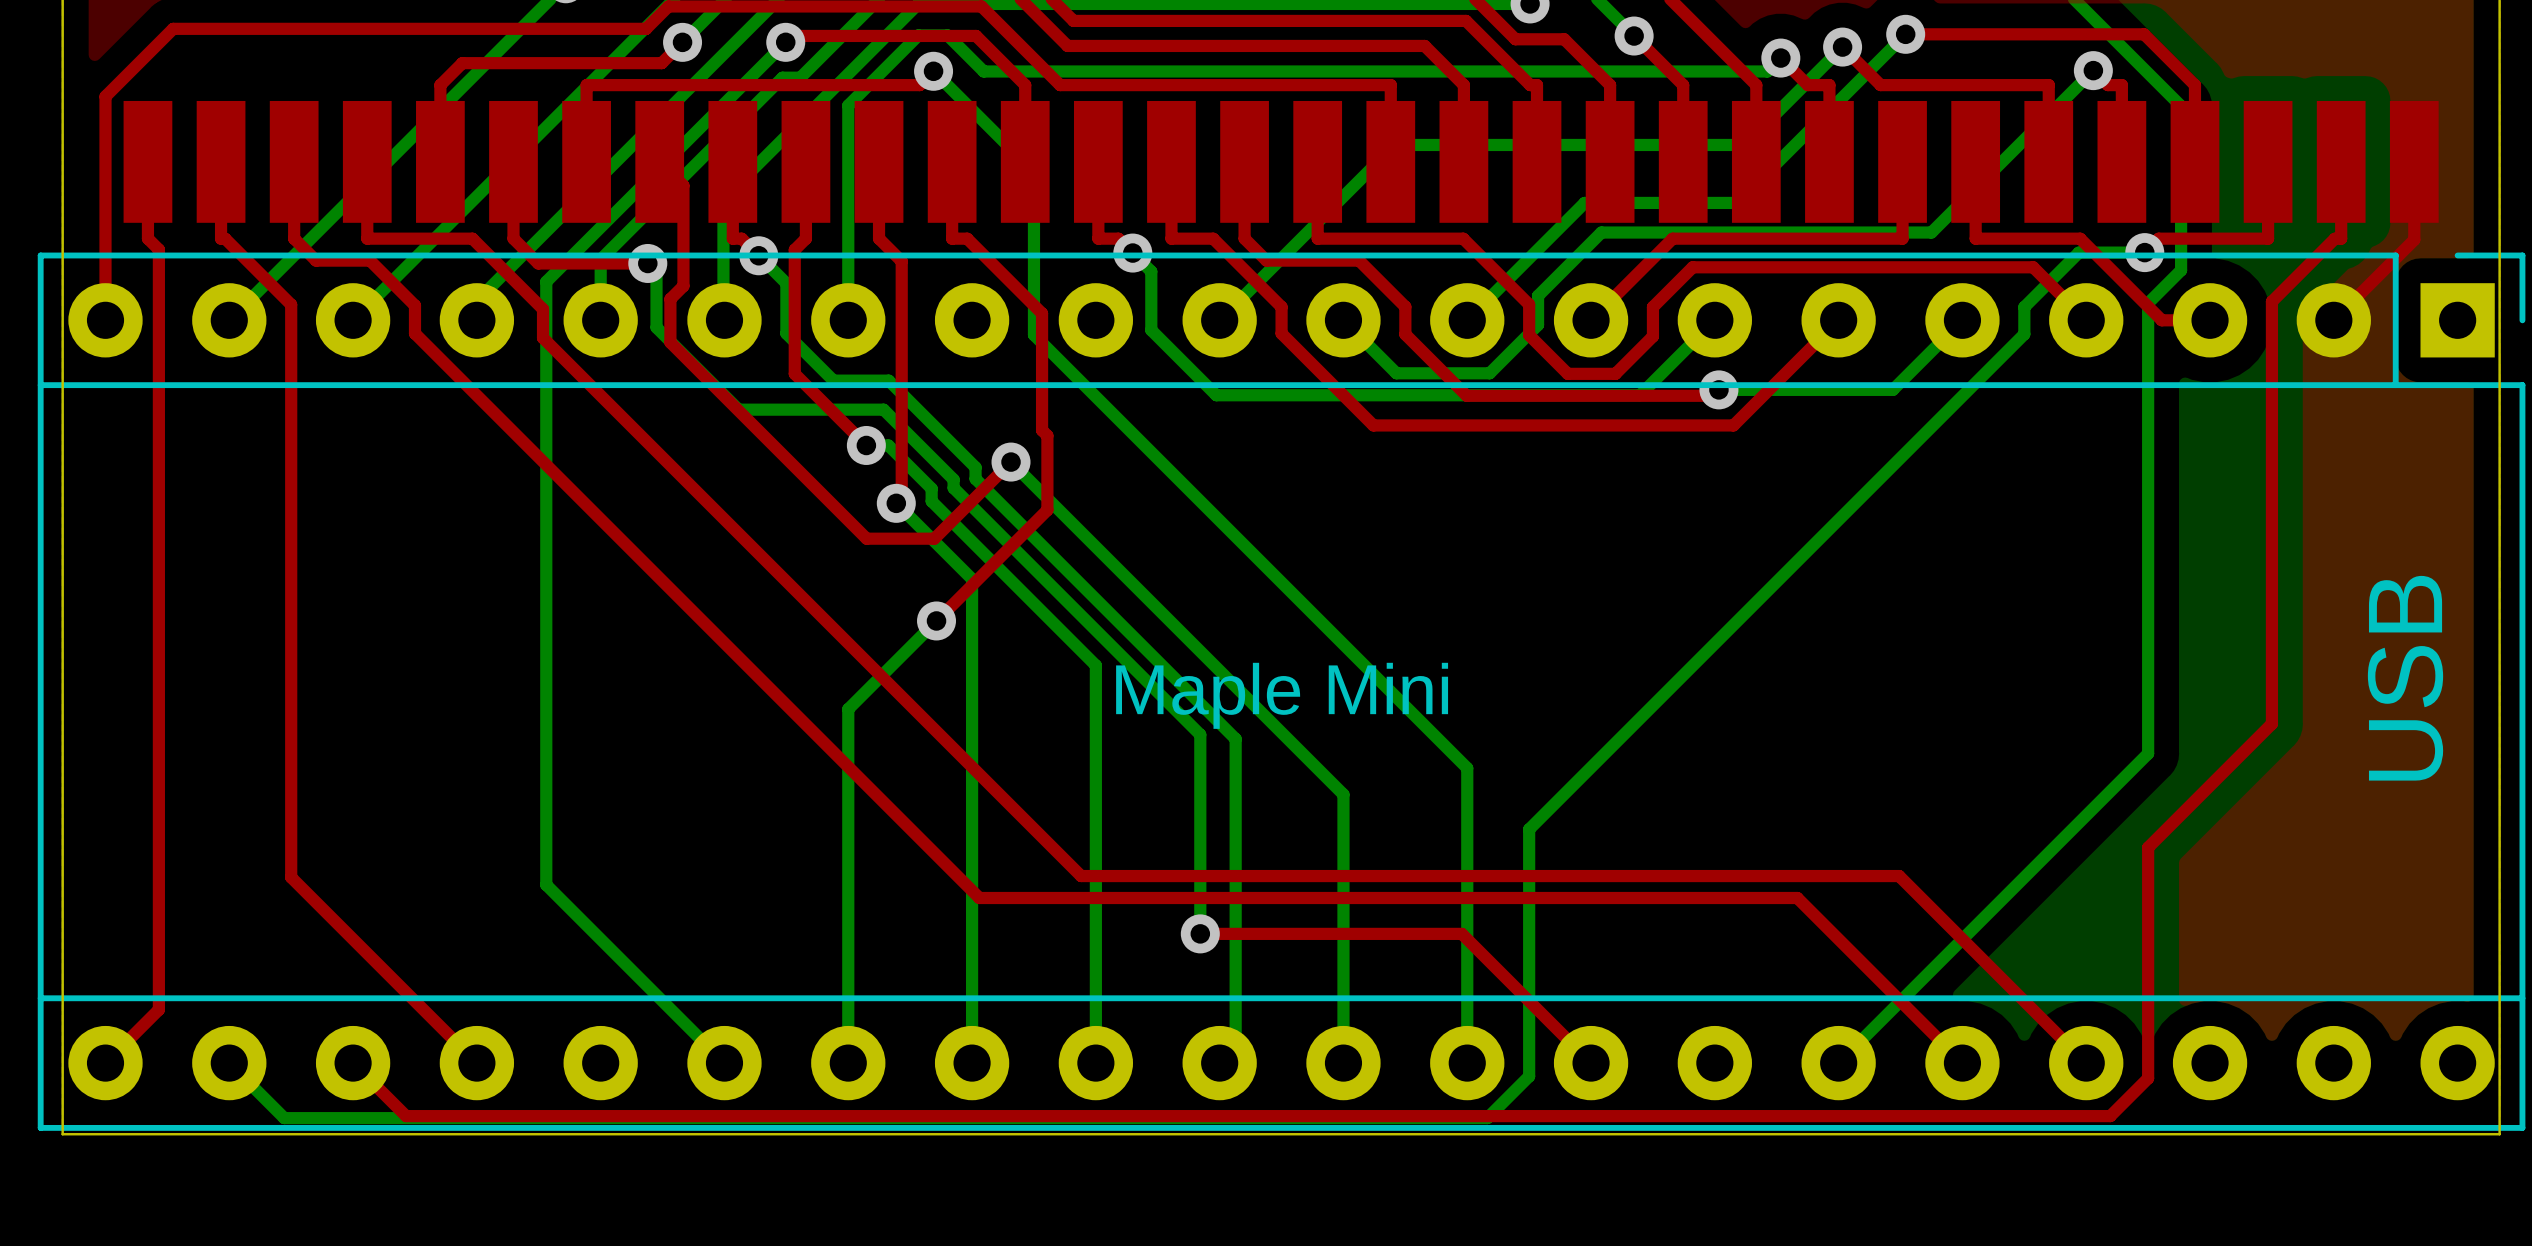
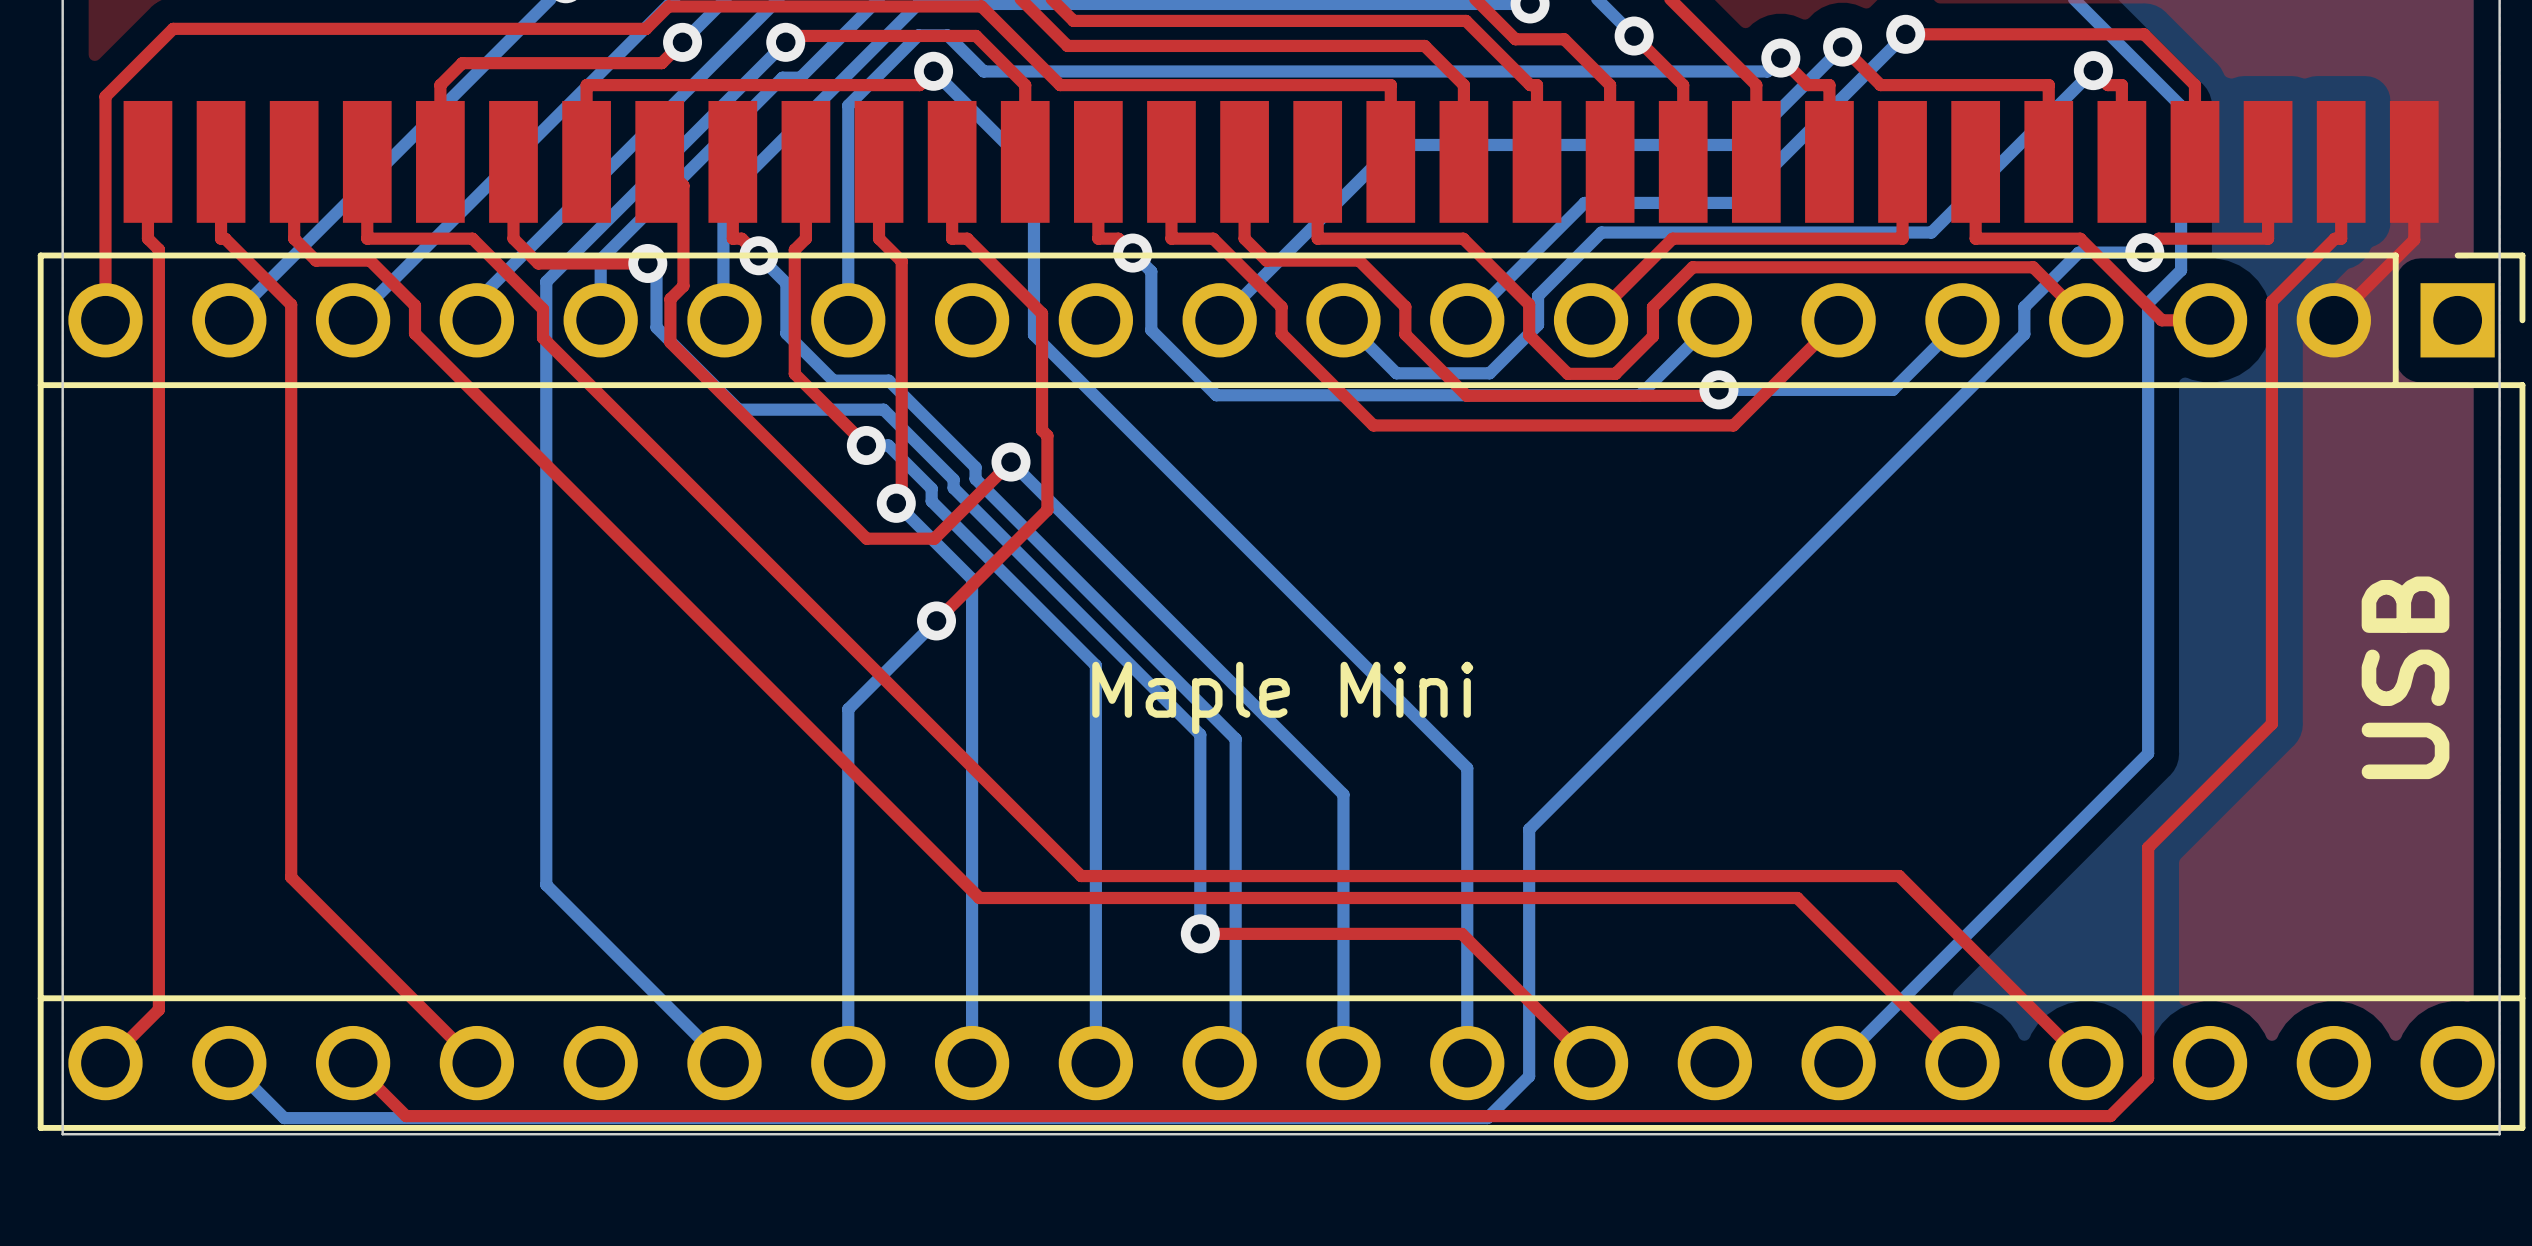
Maple Mini footprint: [37, 252, 2526, 1131] -> [37, 252, 2526, 1131]

